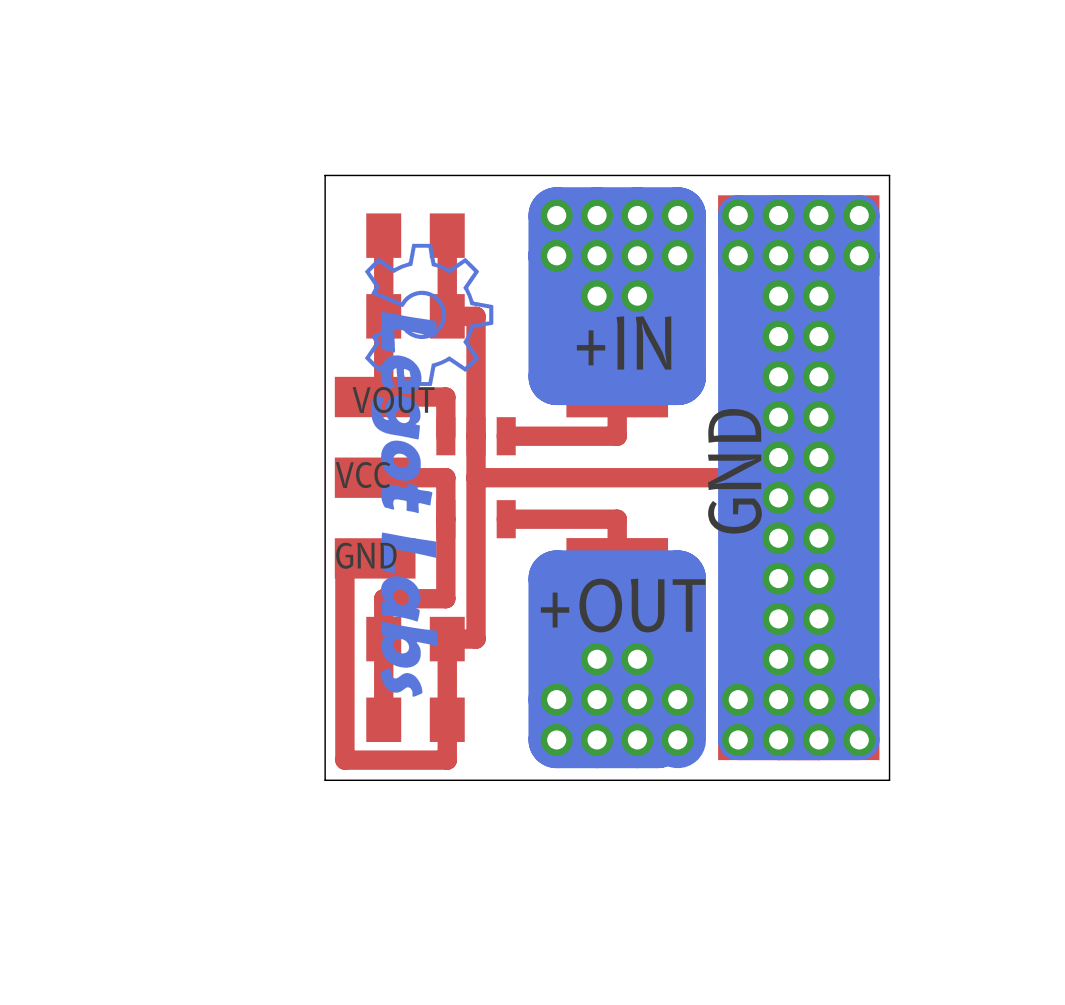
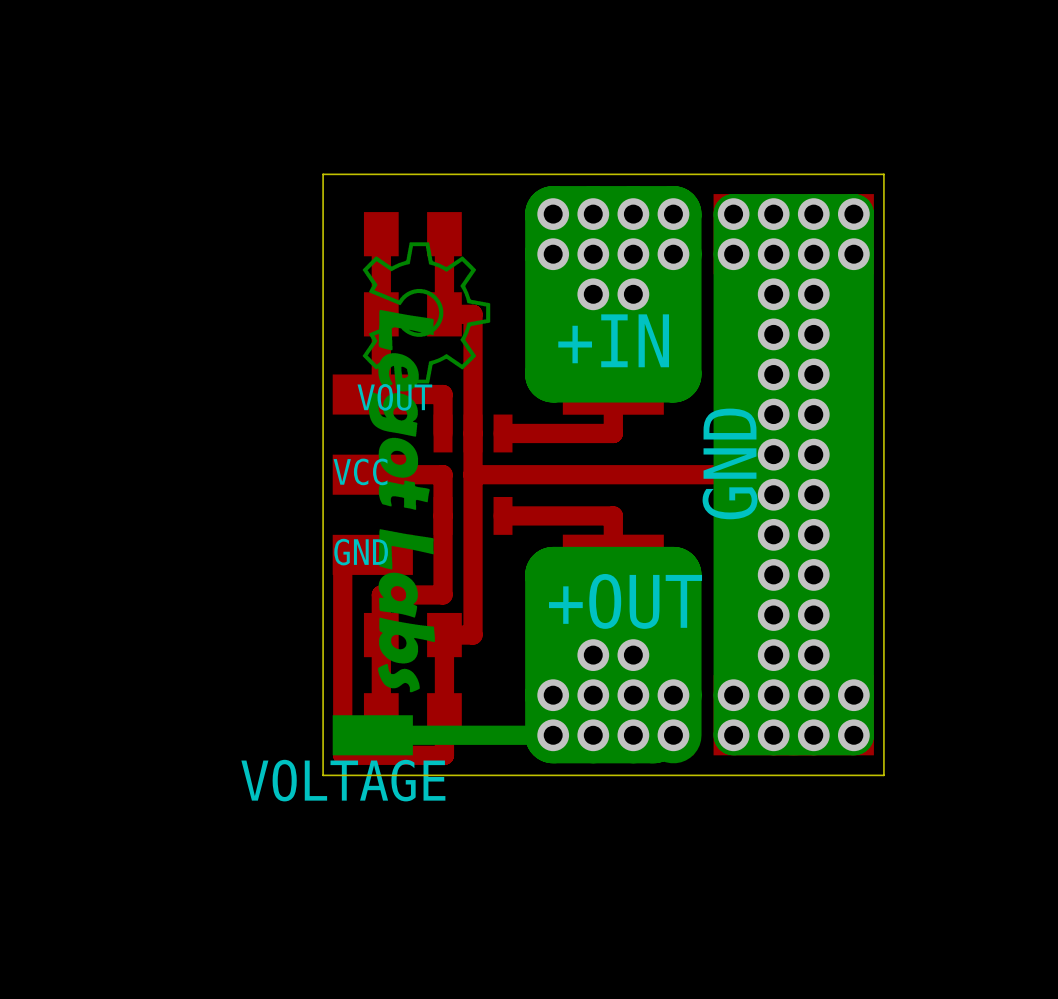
VOLTAGE: none -> (372, 735)
bottom track: none -> (553, 735) (372, 735)

